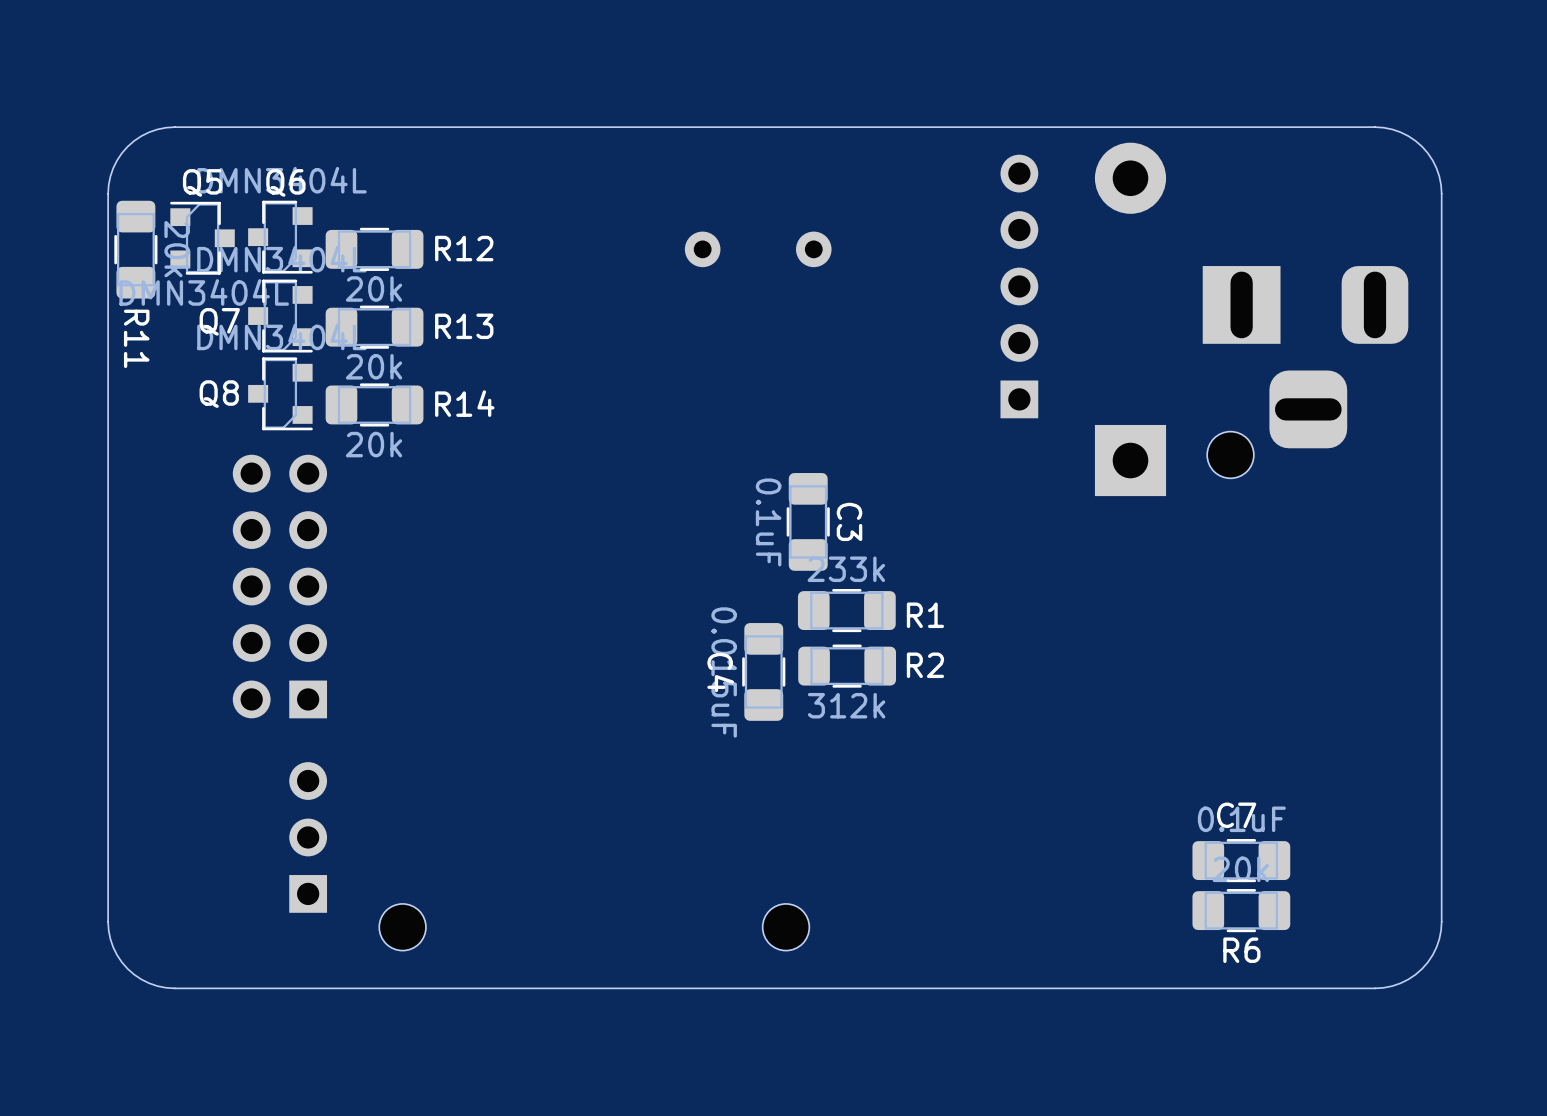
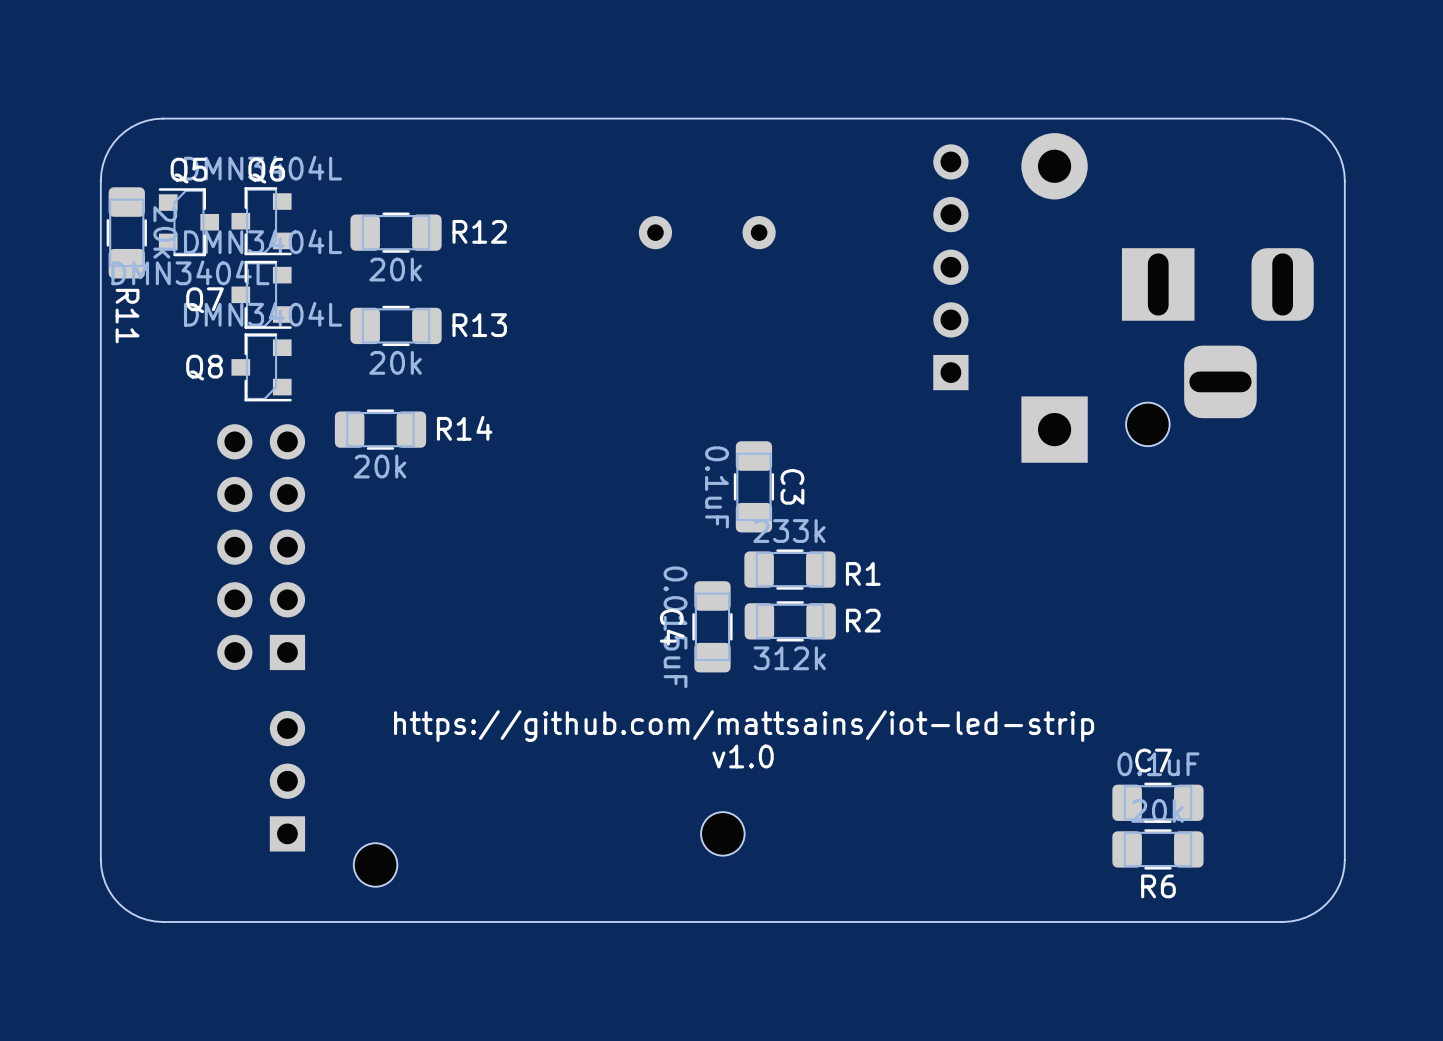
R12 position: (374, 249) -> (396, 232)
R13 position: (374, 327) -> (396, 325)
R14 position: (374, 404) -> (380, 429)
text: none -> https://github.com/mattsains/iot-led-strip (744, 726)
text: none -> v1.0 (743, 756)
part position: (786, 927) -> (722, 833)

